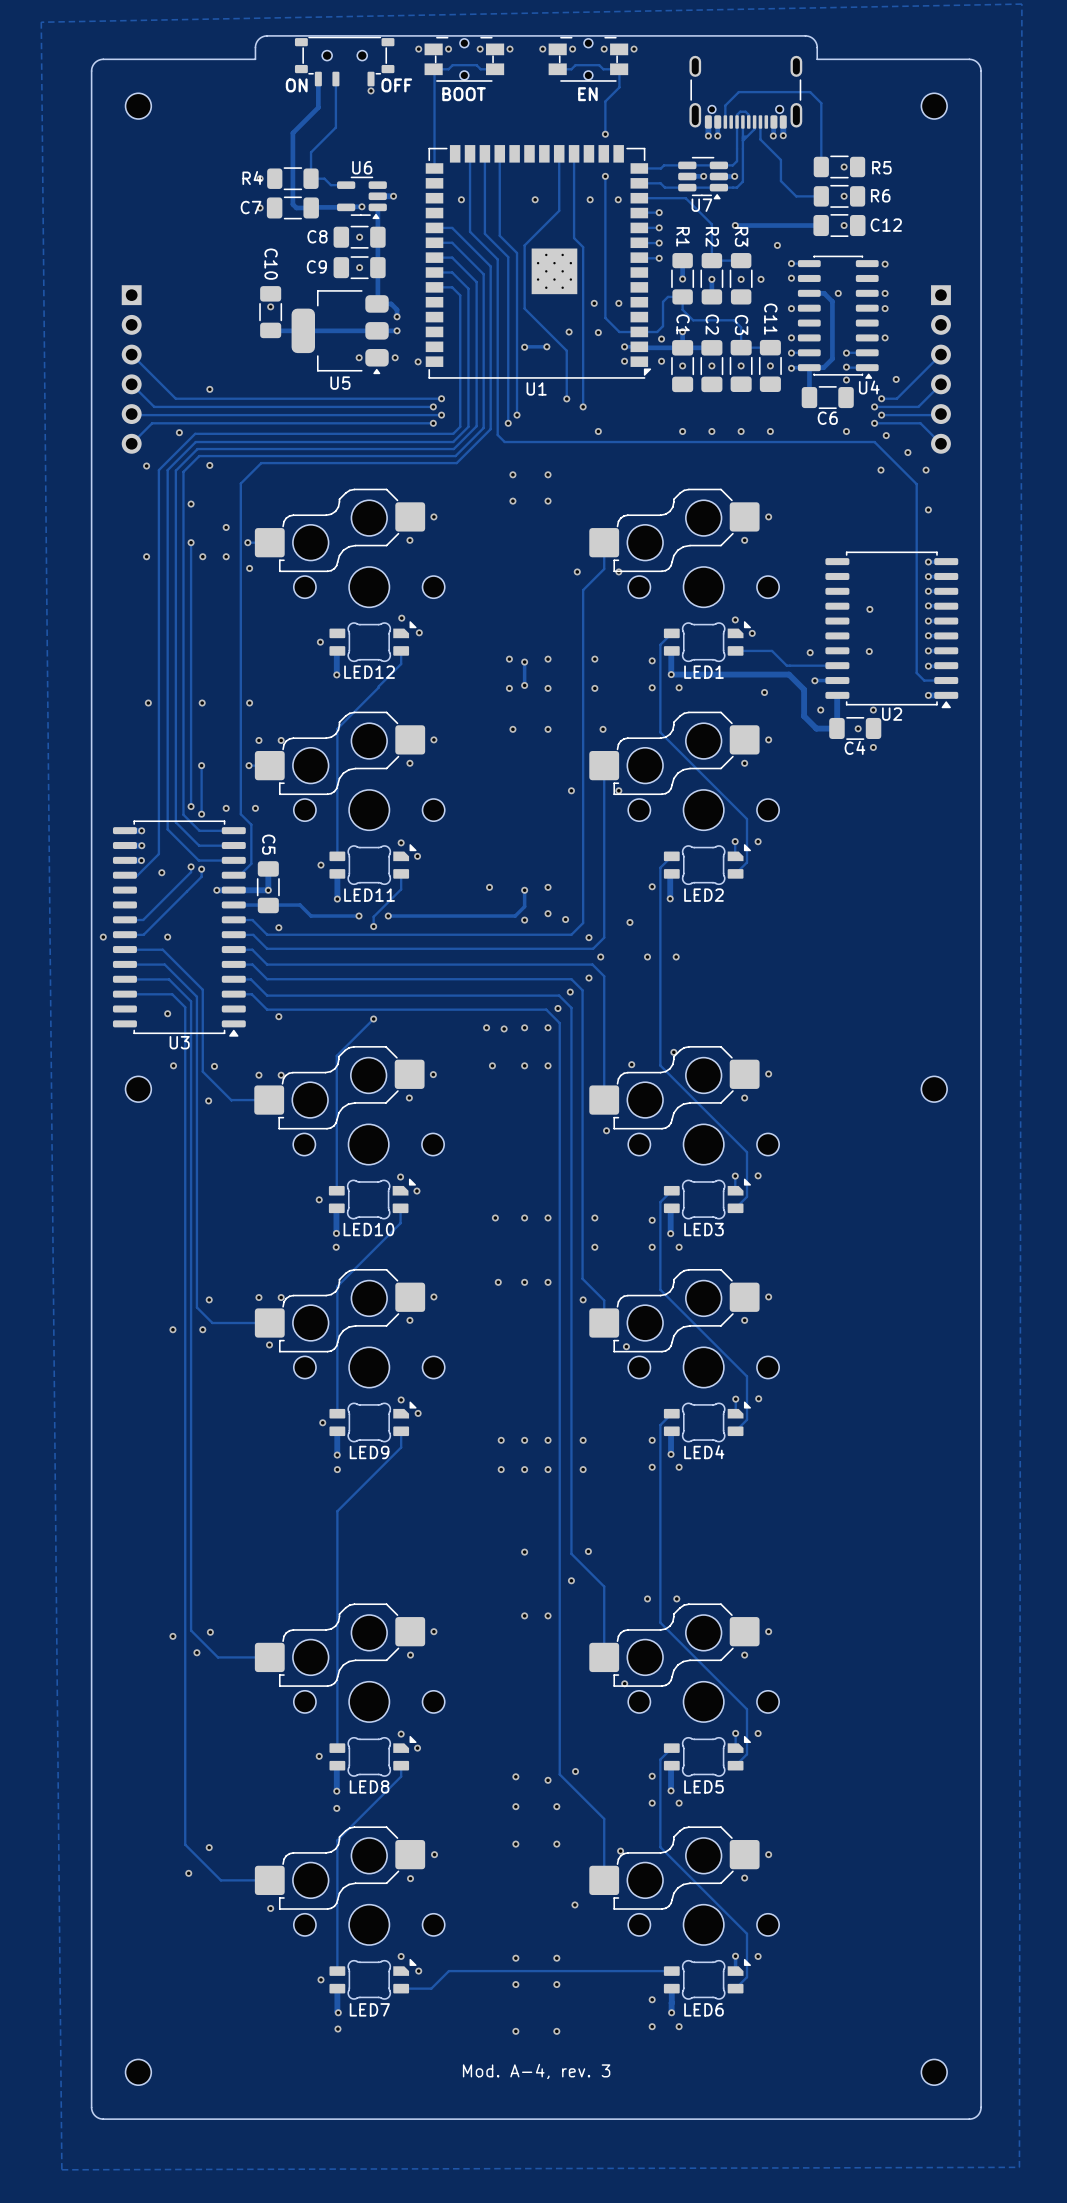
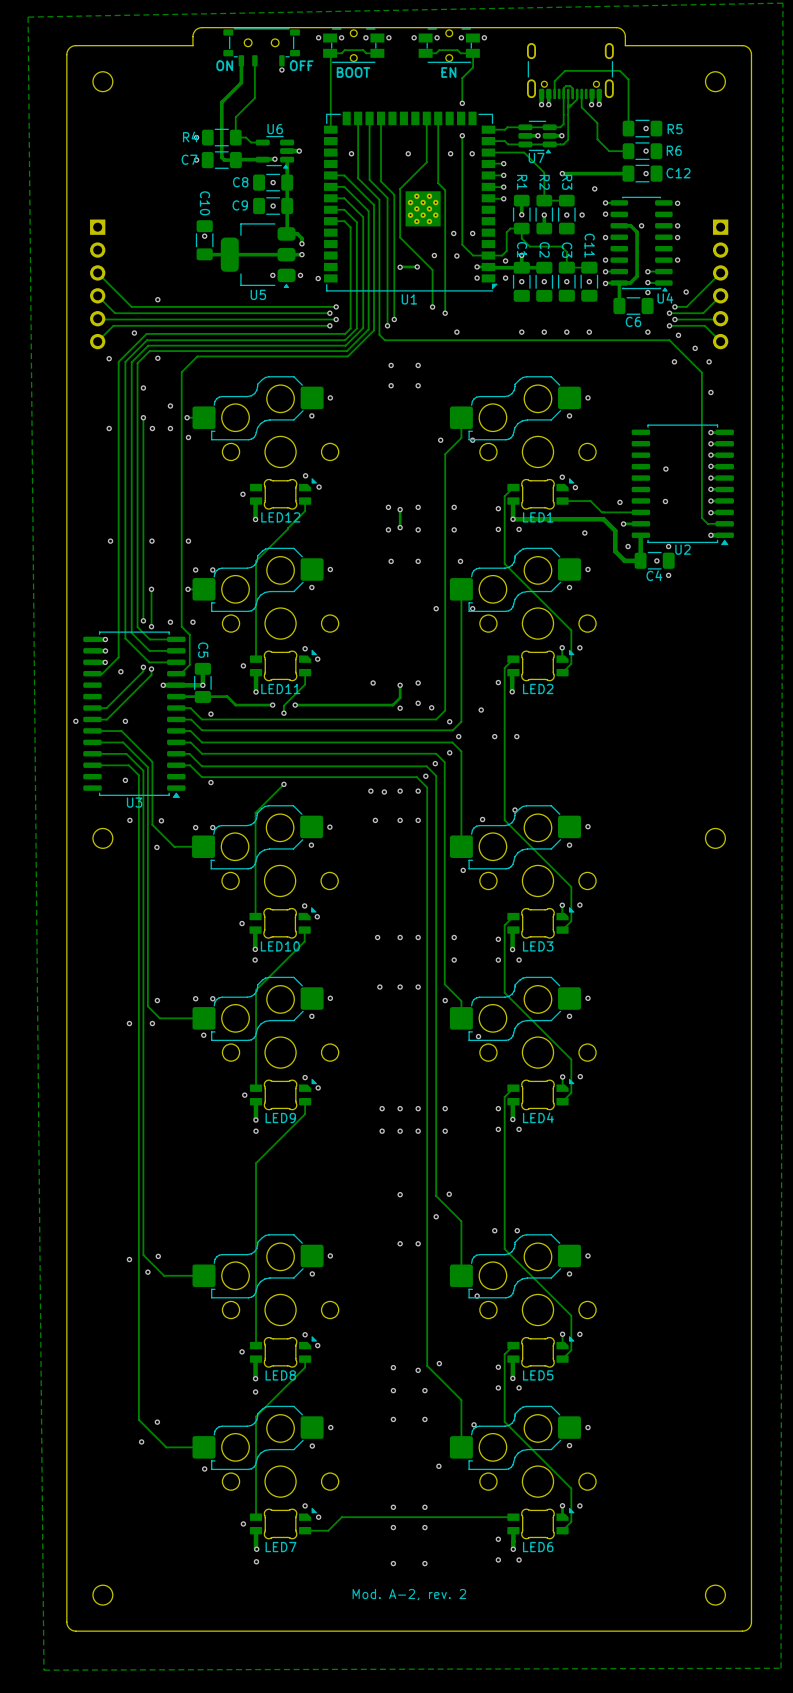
text: Mod. A-4, rev. 3 (536, 2071) -> Mod. A-2, rev. 2 (409, 1594)

